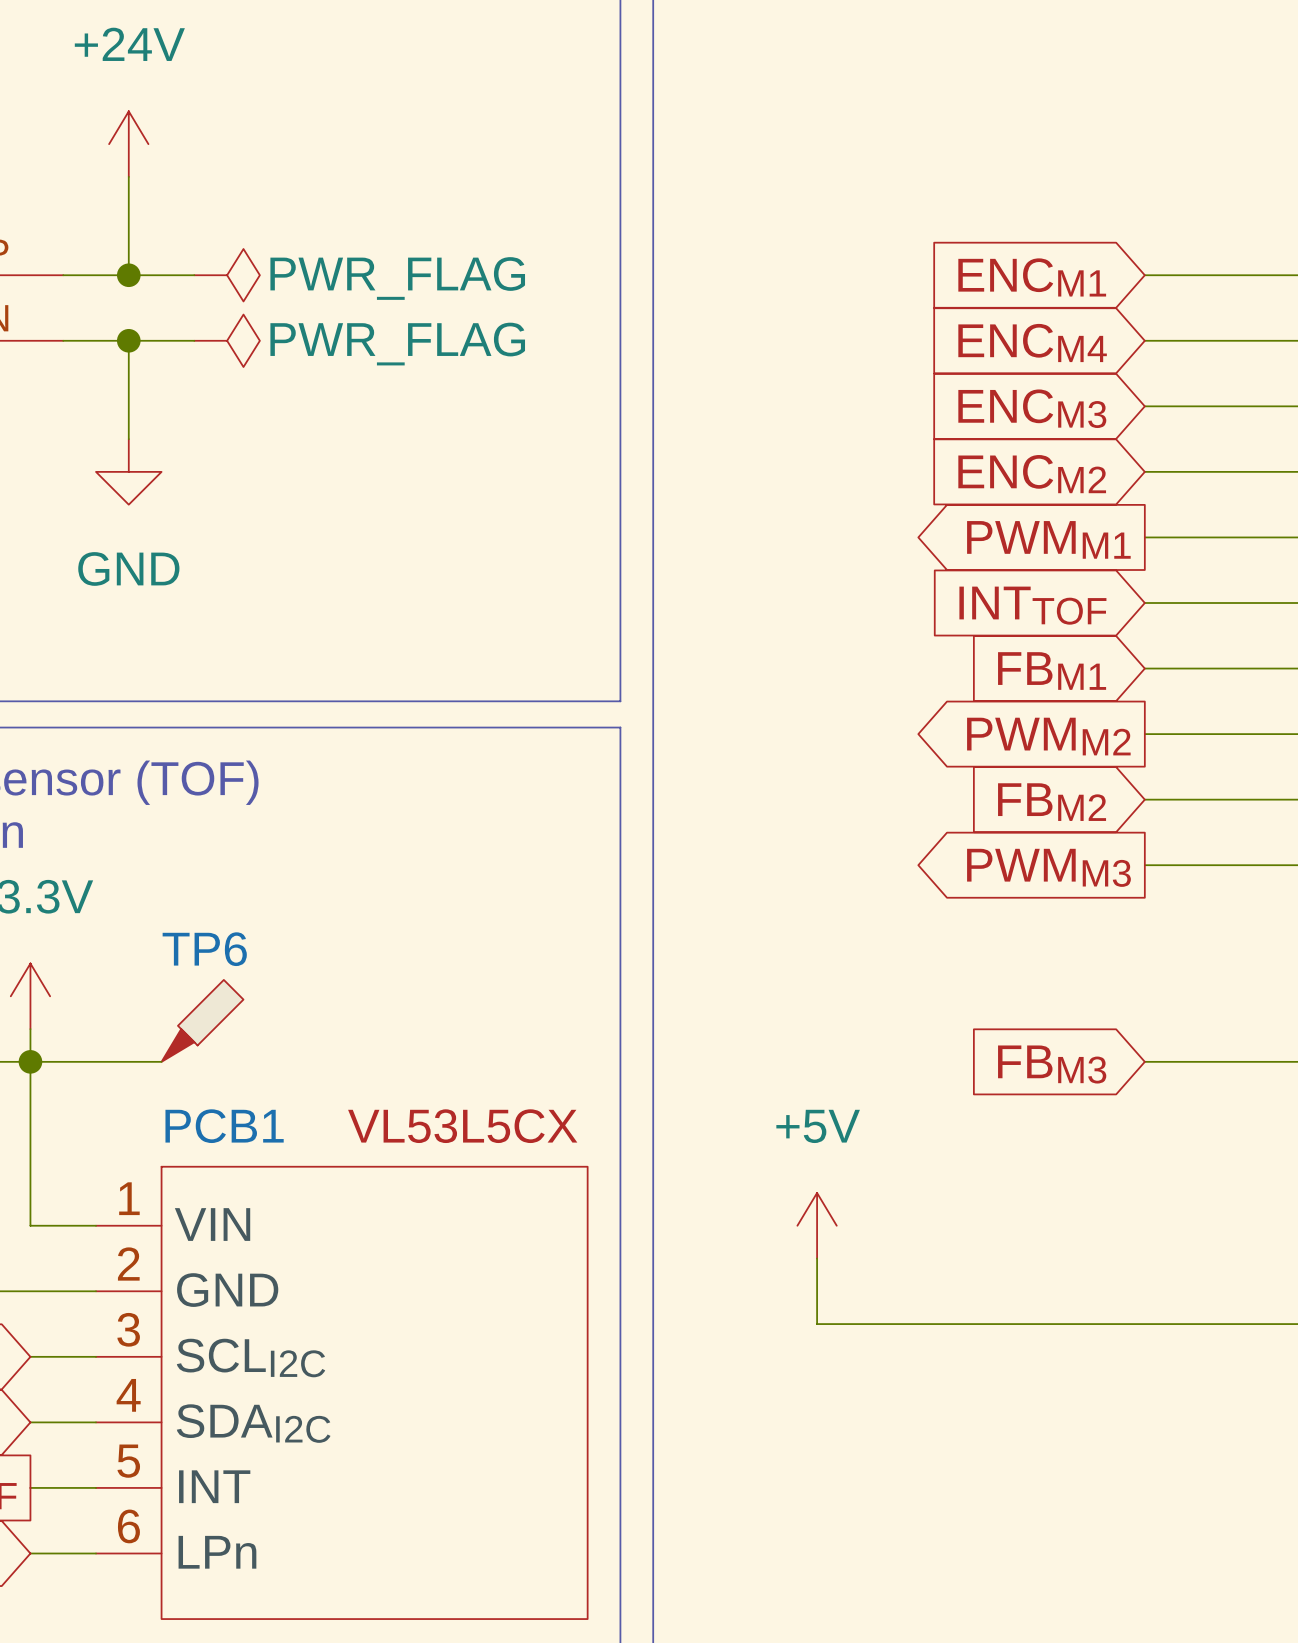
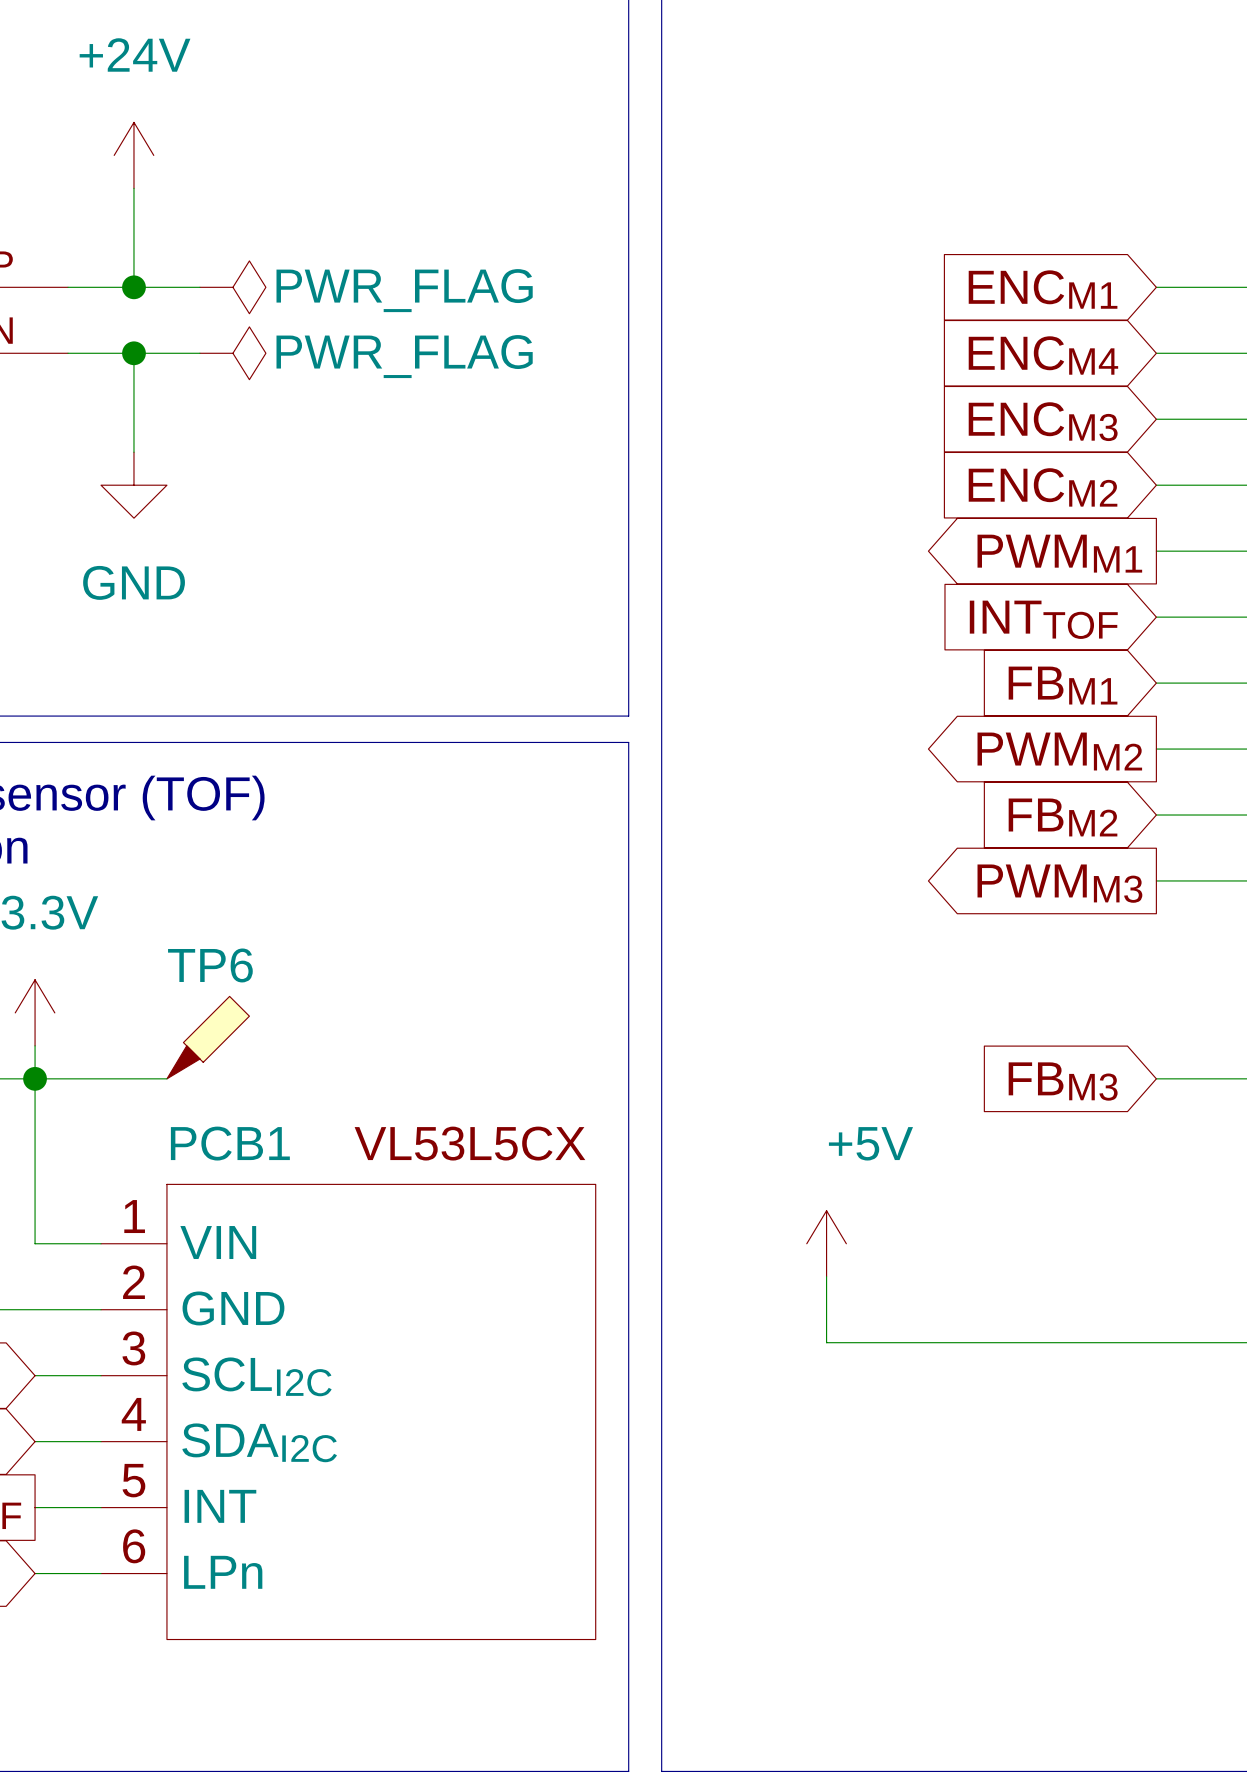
power symbol text position: +5V (818, 1126) -> +5V (870, 1143)

